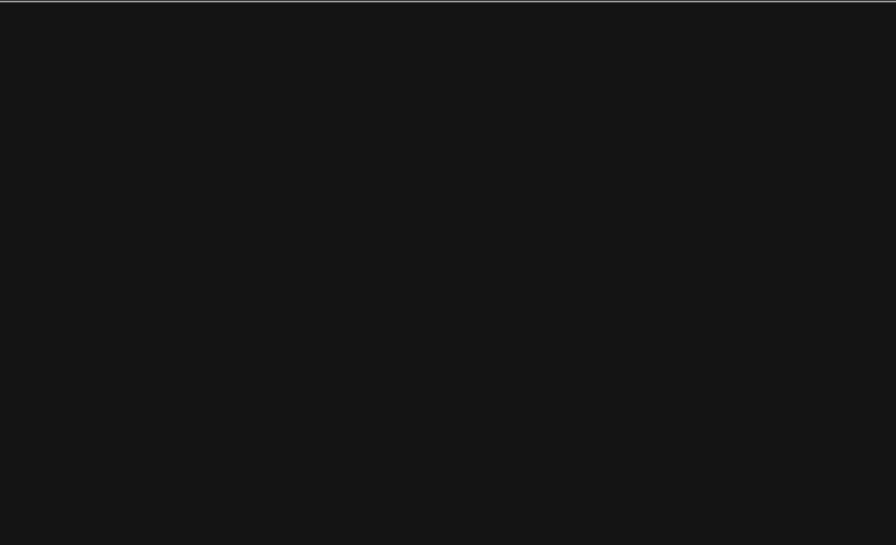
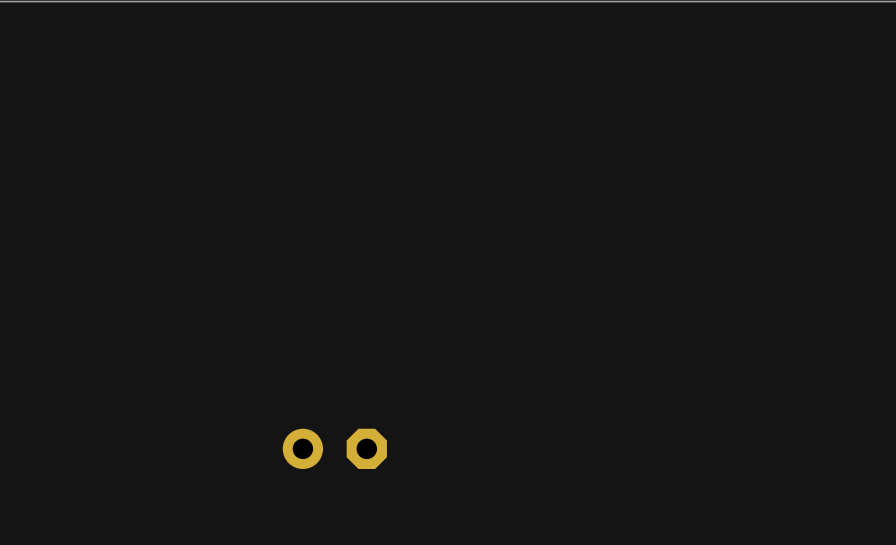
part: none -> (334, 448)

